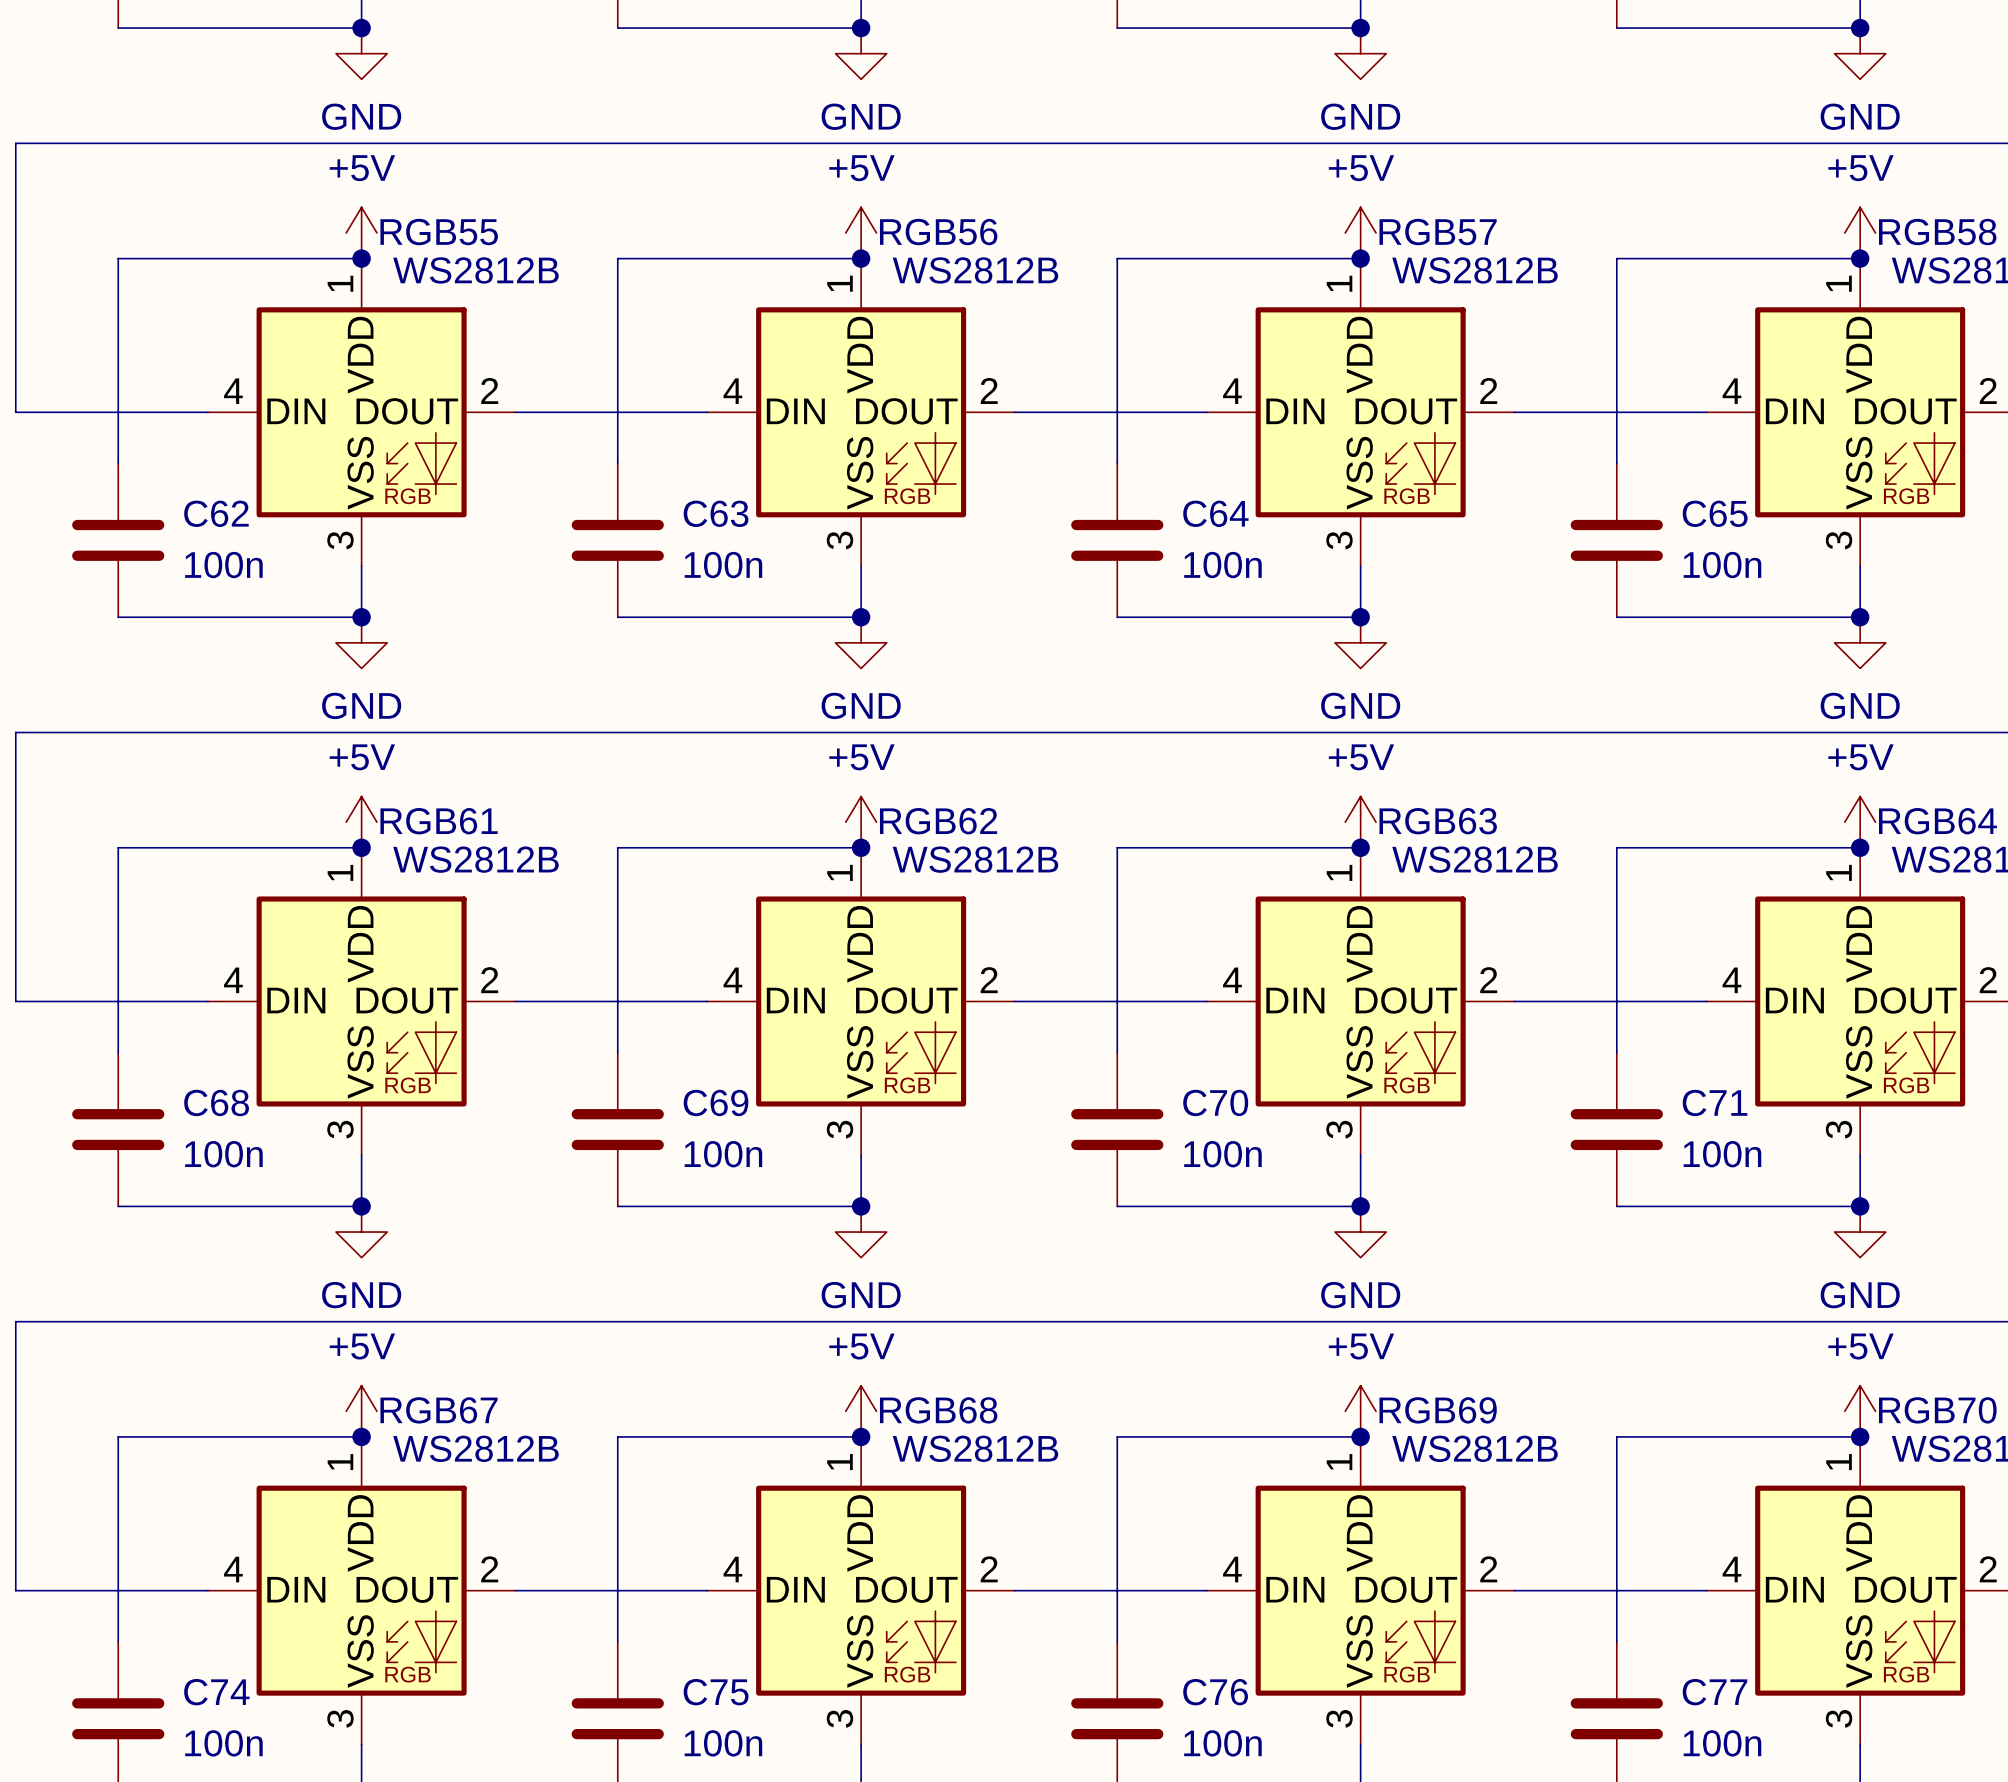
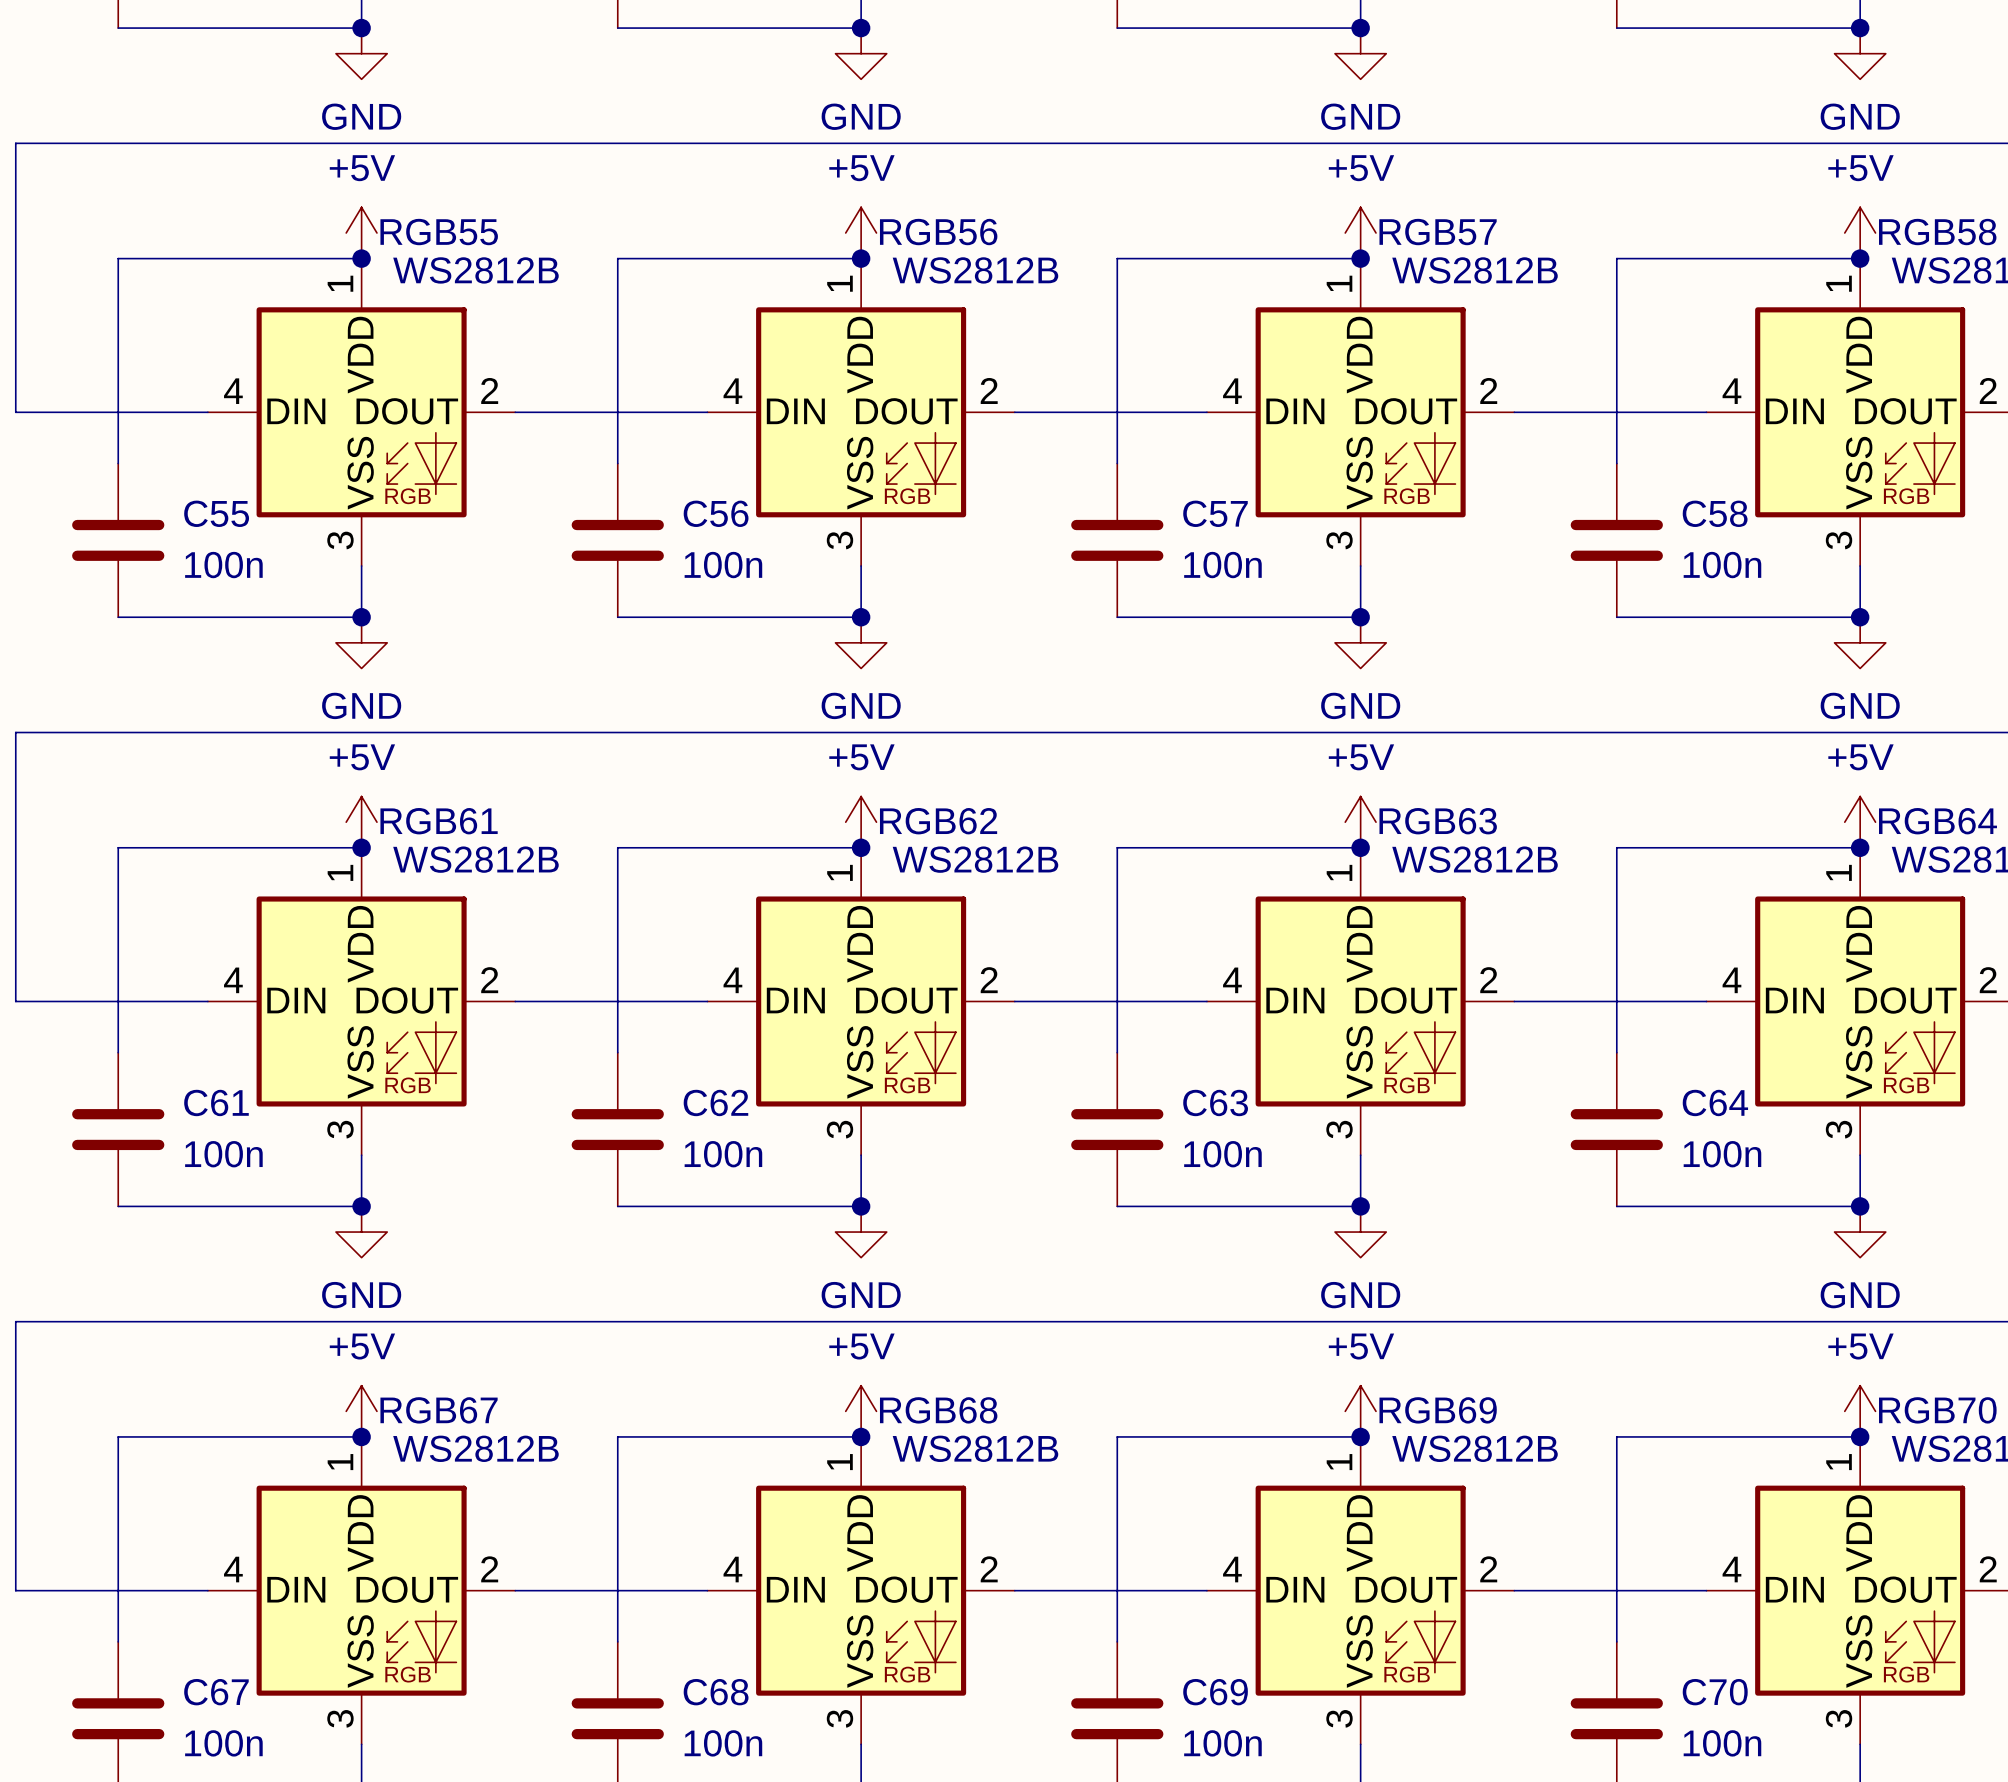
C62 name: C62 (216, 513) -> C55 (216, 513)
C63 name: C63 (716, 513) -> C56 (716, 513)
C64 name: C64 (1215, 513) -> C57 (1215, 513)
C65 name: C65 (1715, 513) -> C58 (1715, 513)
C68 name: C68 (216, 1102) -> C61 (216, 1102)
C69 name: C69 (716, 1102) -> C62 (715, 1102)
C70 name: C70 (1215, 1102) -> C63 (1215, 1102)
C71 name: C71 (1715, 1102) -> C64 (1715, 1102)
C74 name: C74 (216, 1692) -> C67 (216, 1692)
C75 name: C75 (716, 1692) -> C68 (716, 1692)
C76 name: C76 (1215, 1692) -> C69 (1215, 1692)
C77 name: C77 (1715, 1692) -> C70 (1715, 1692)

